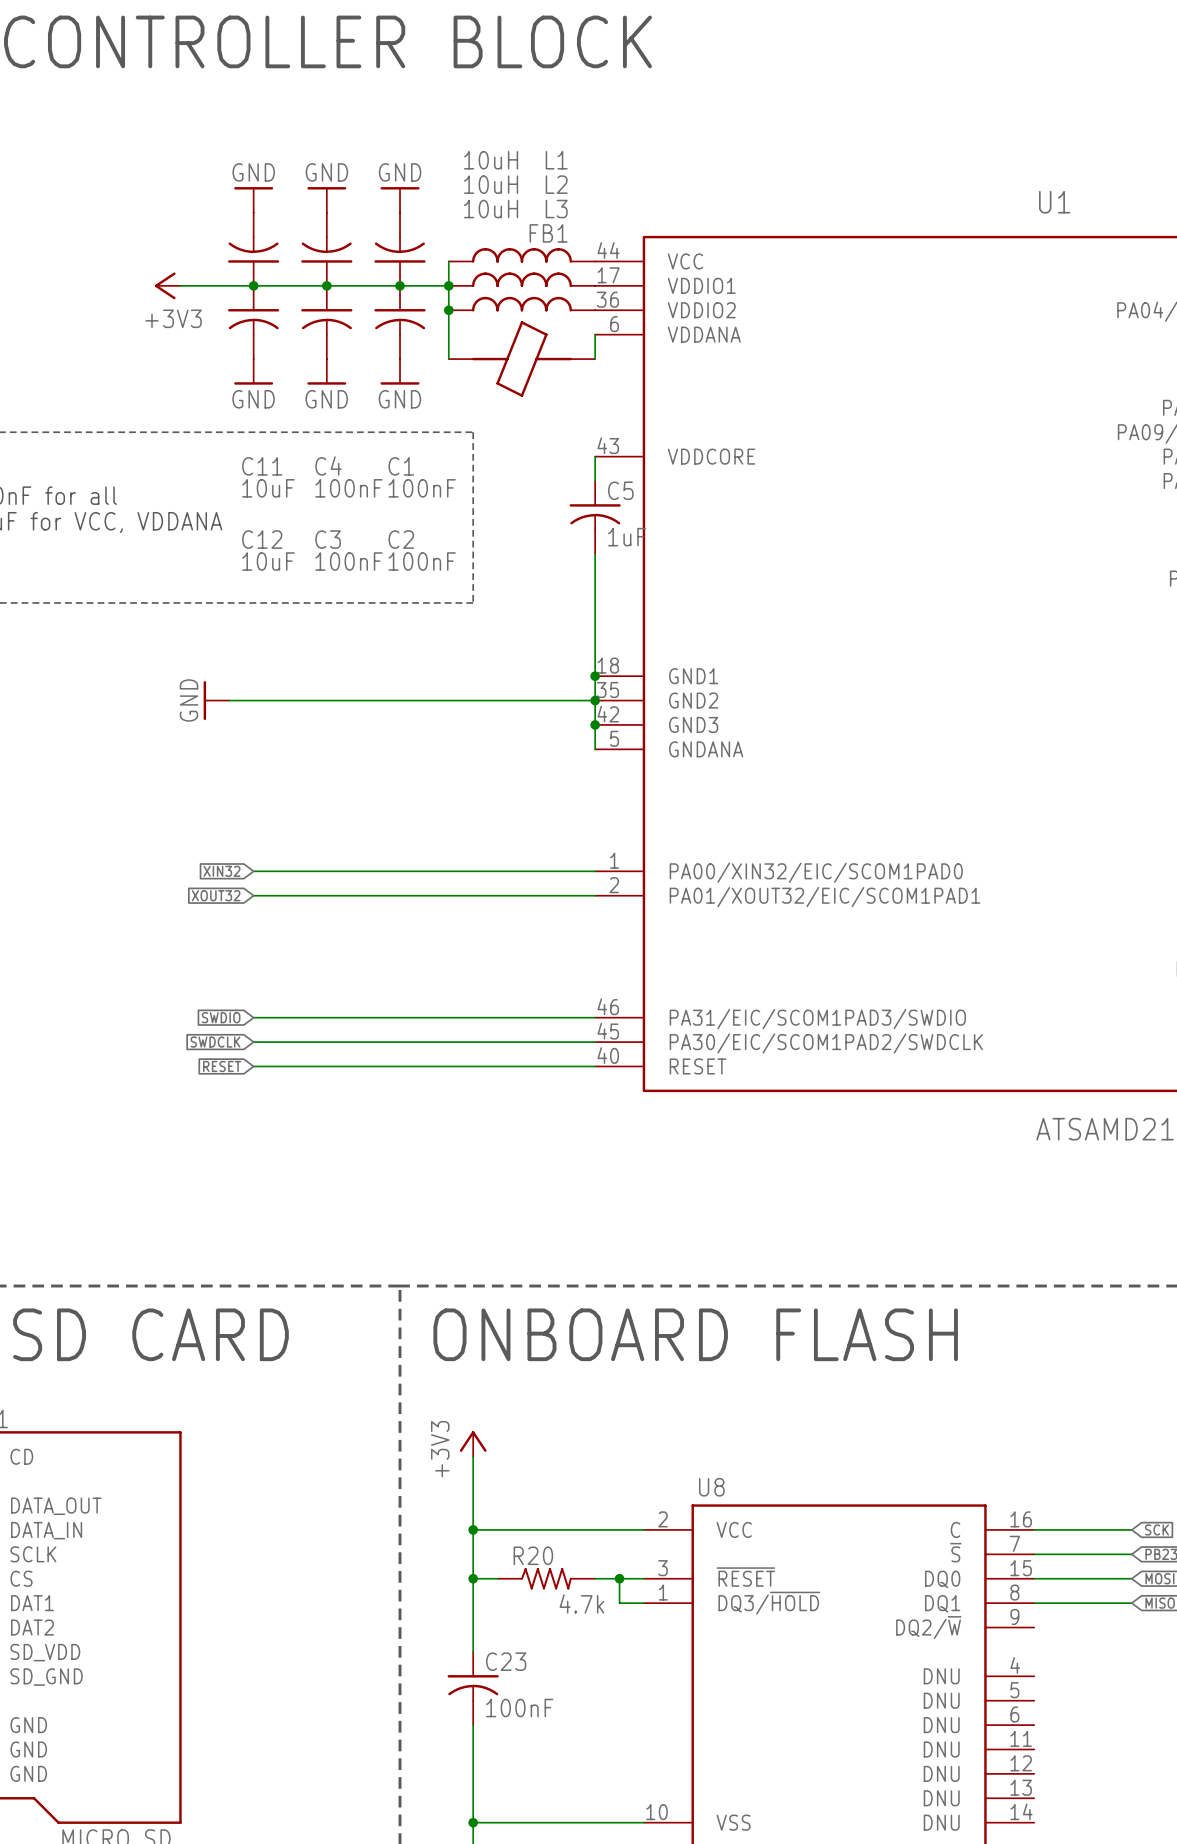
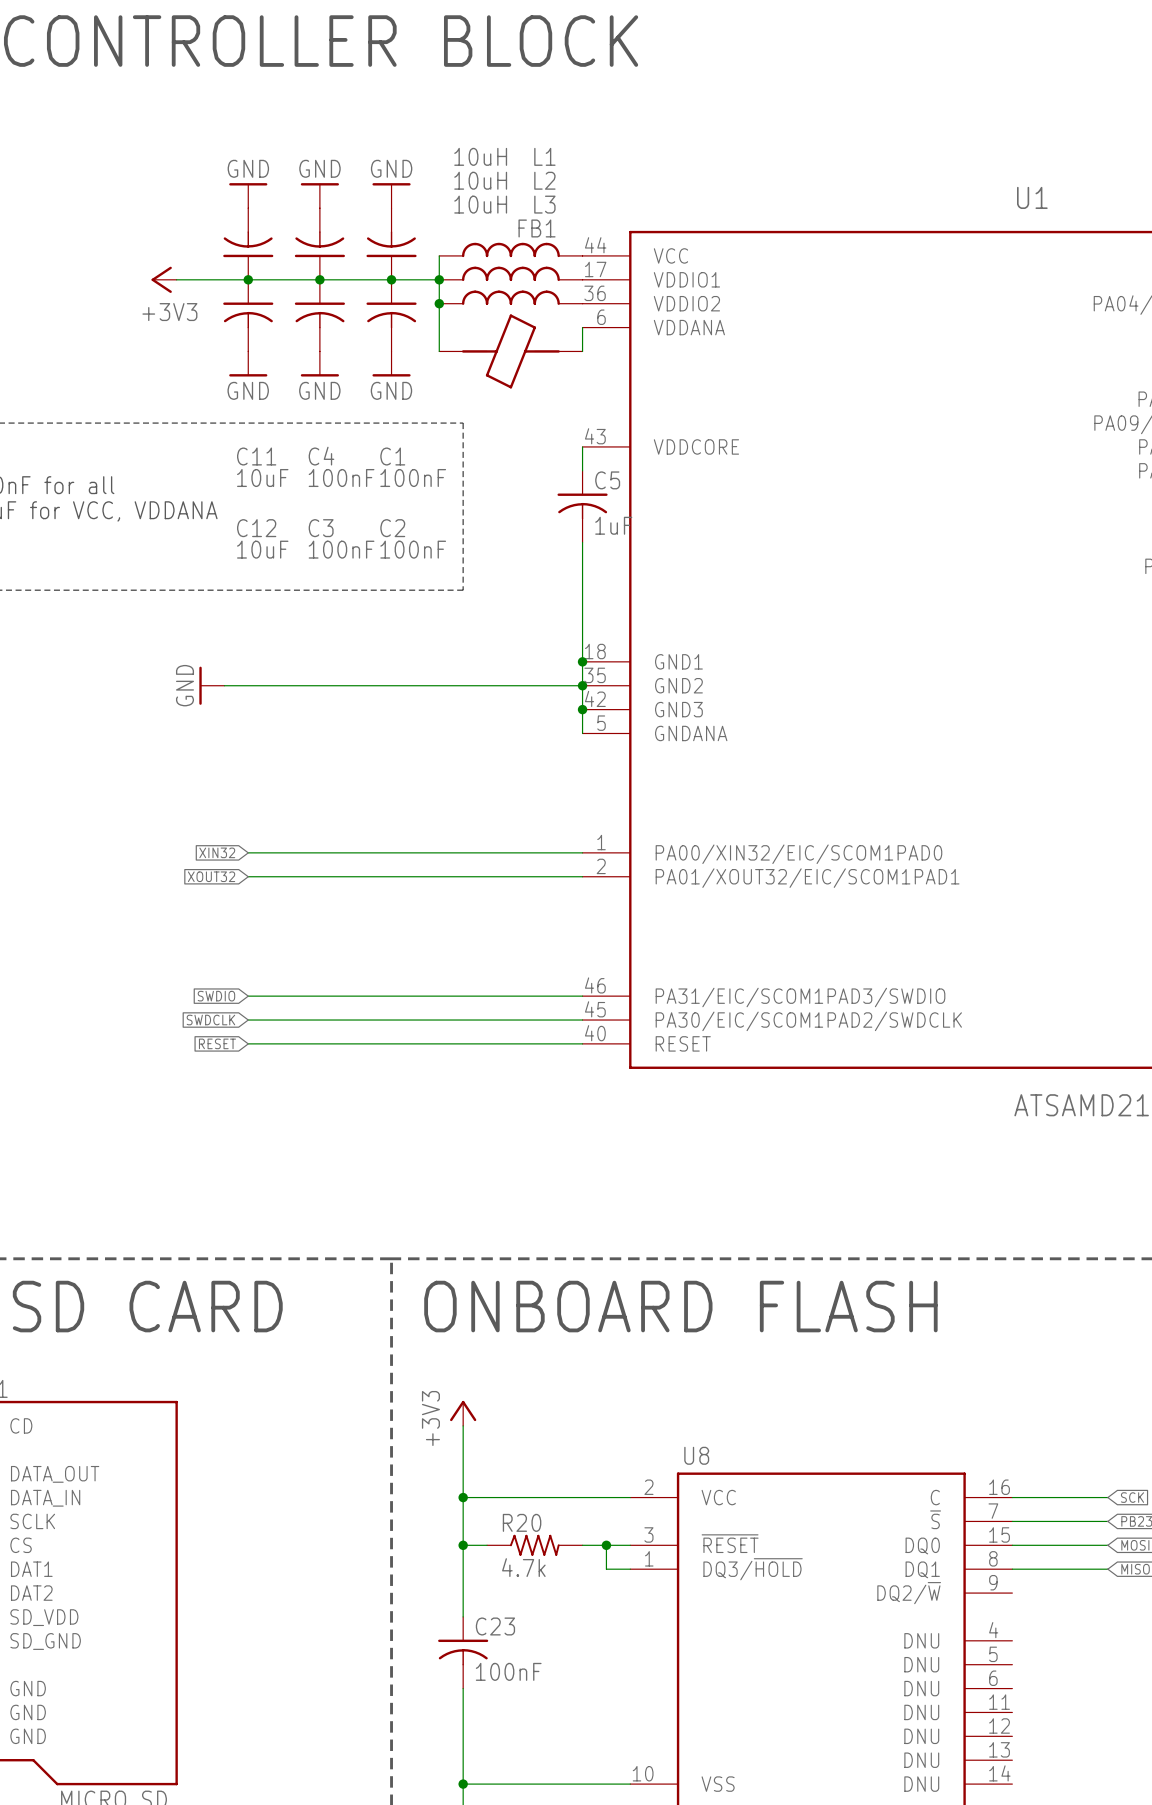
R20 value position: 4.7k (581, 1603) -> 4.7k (523, 1567)

